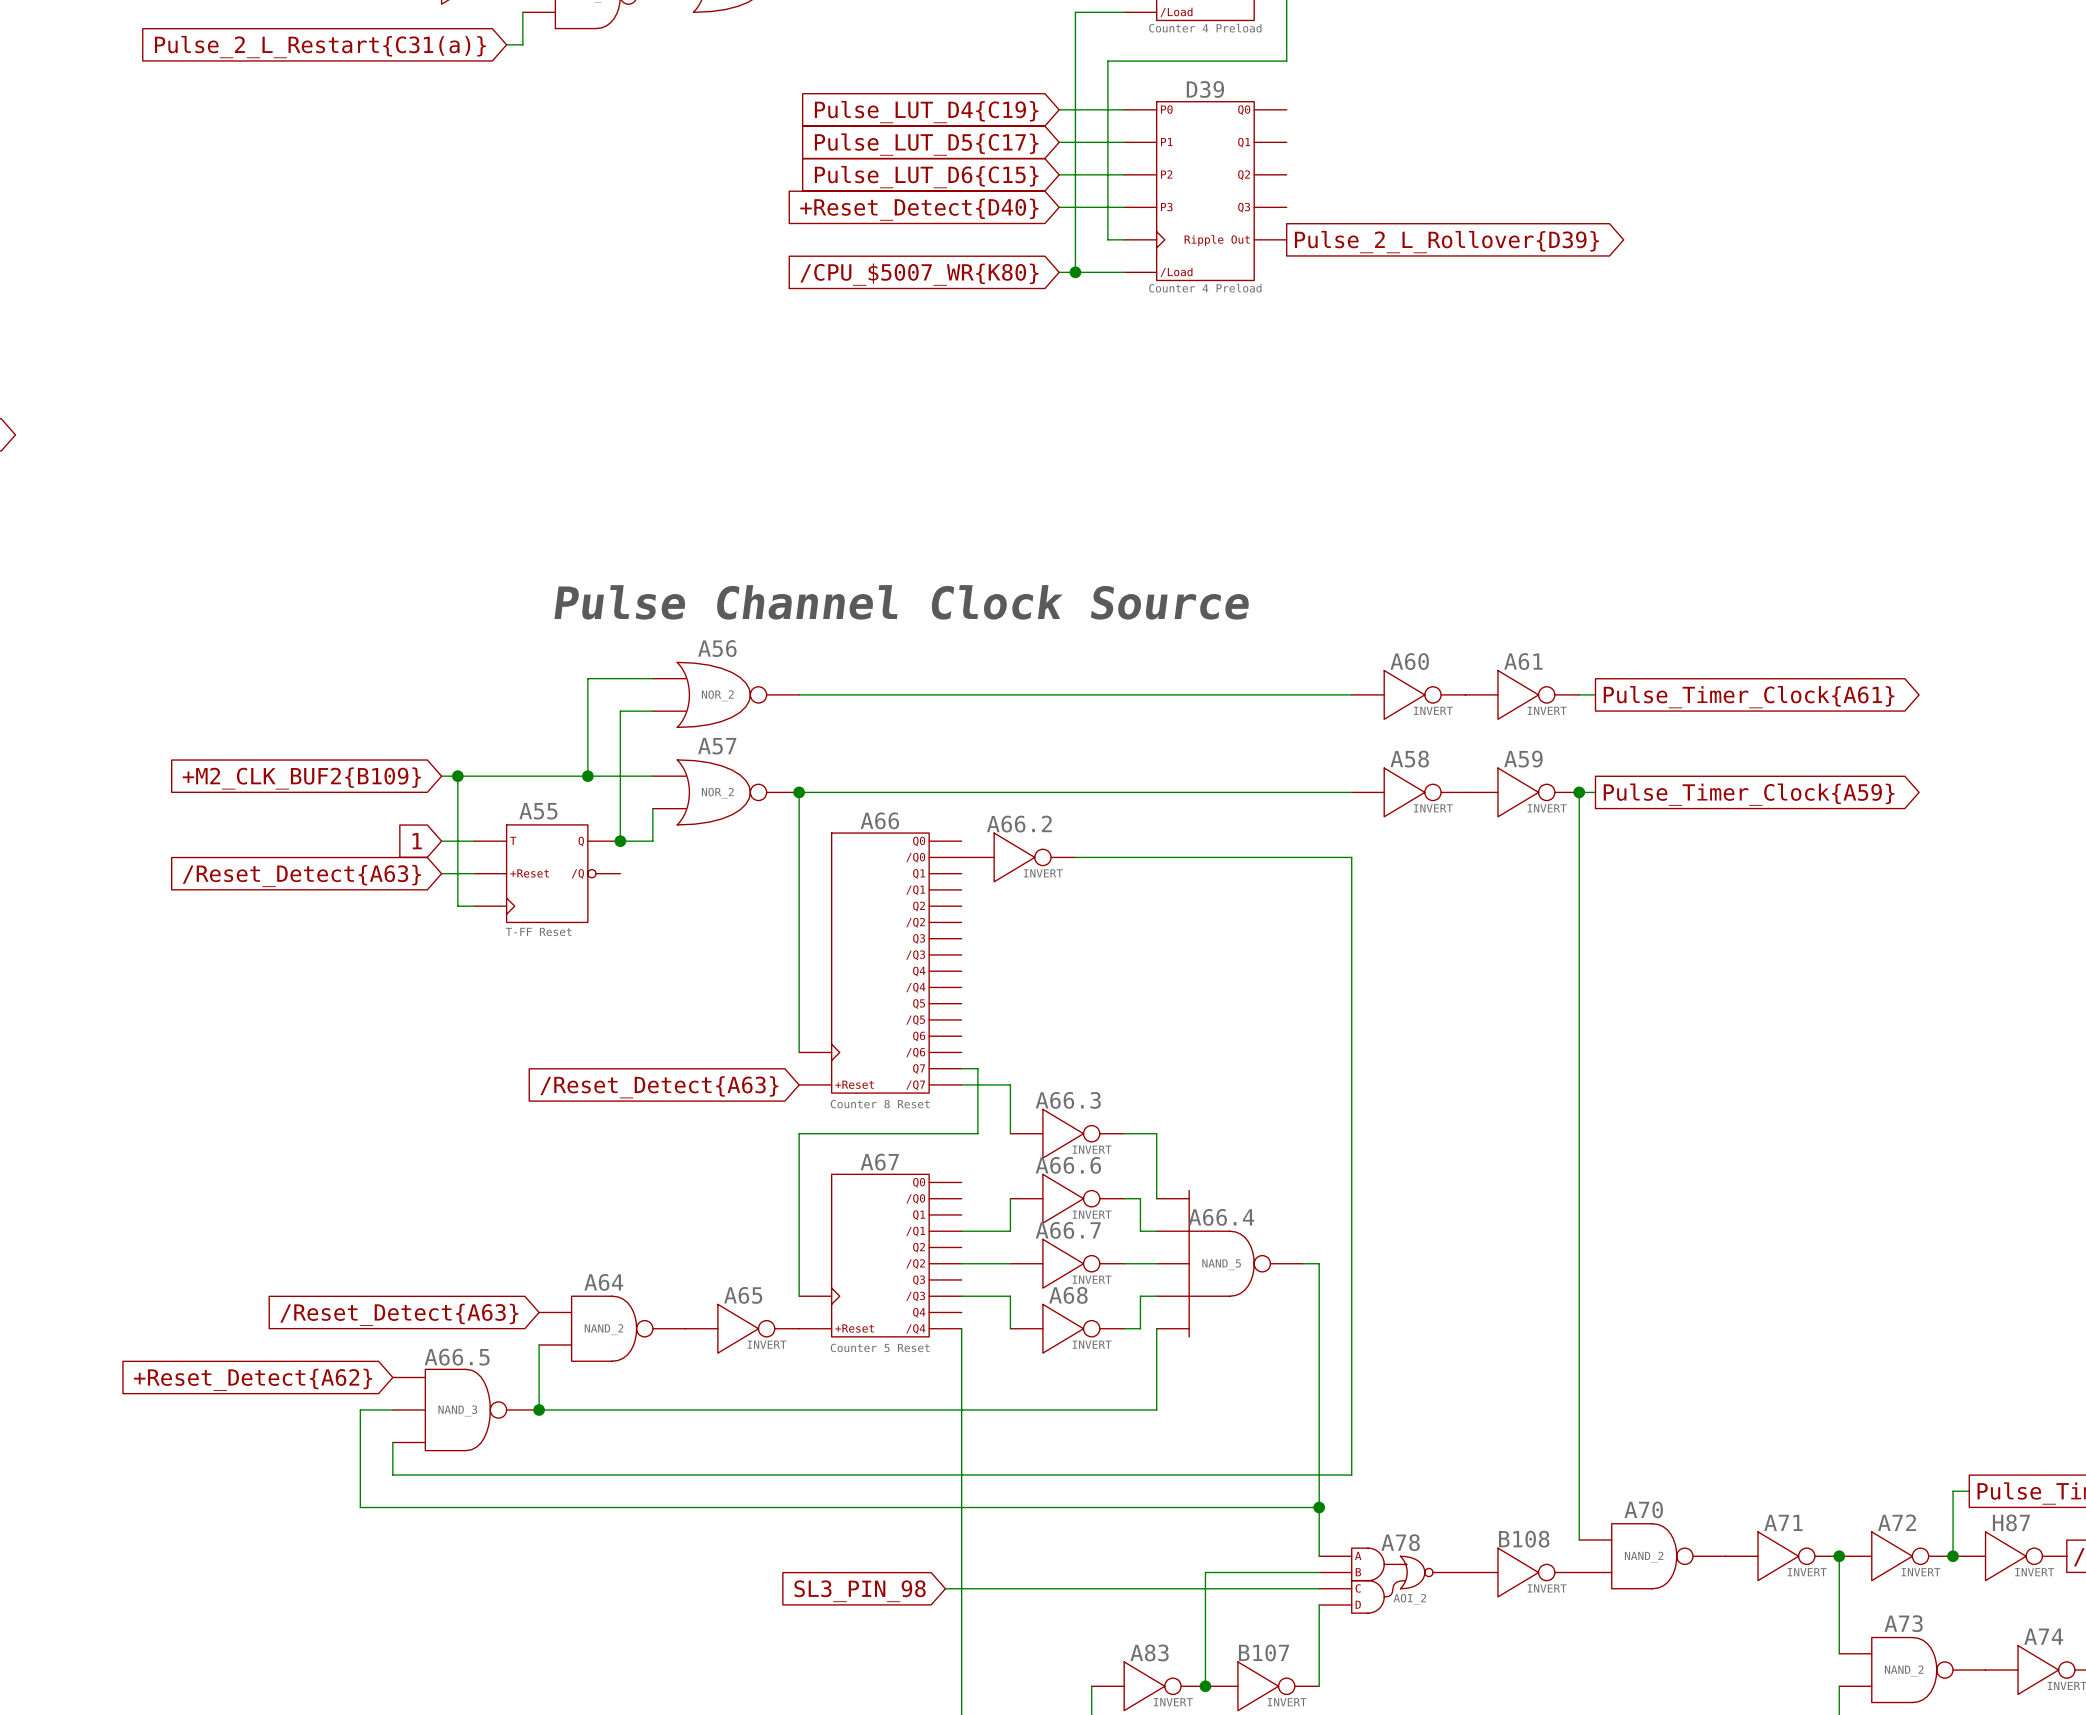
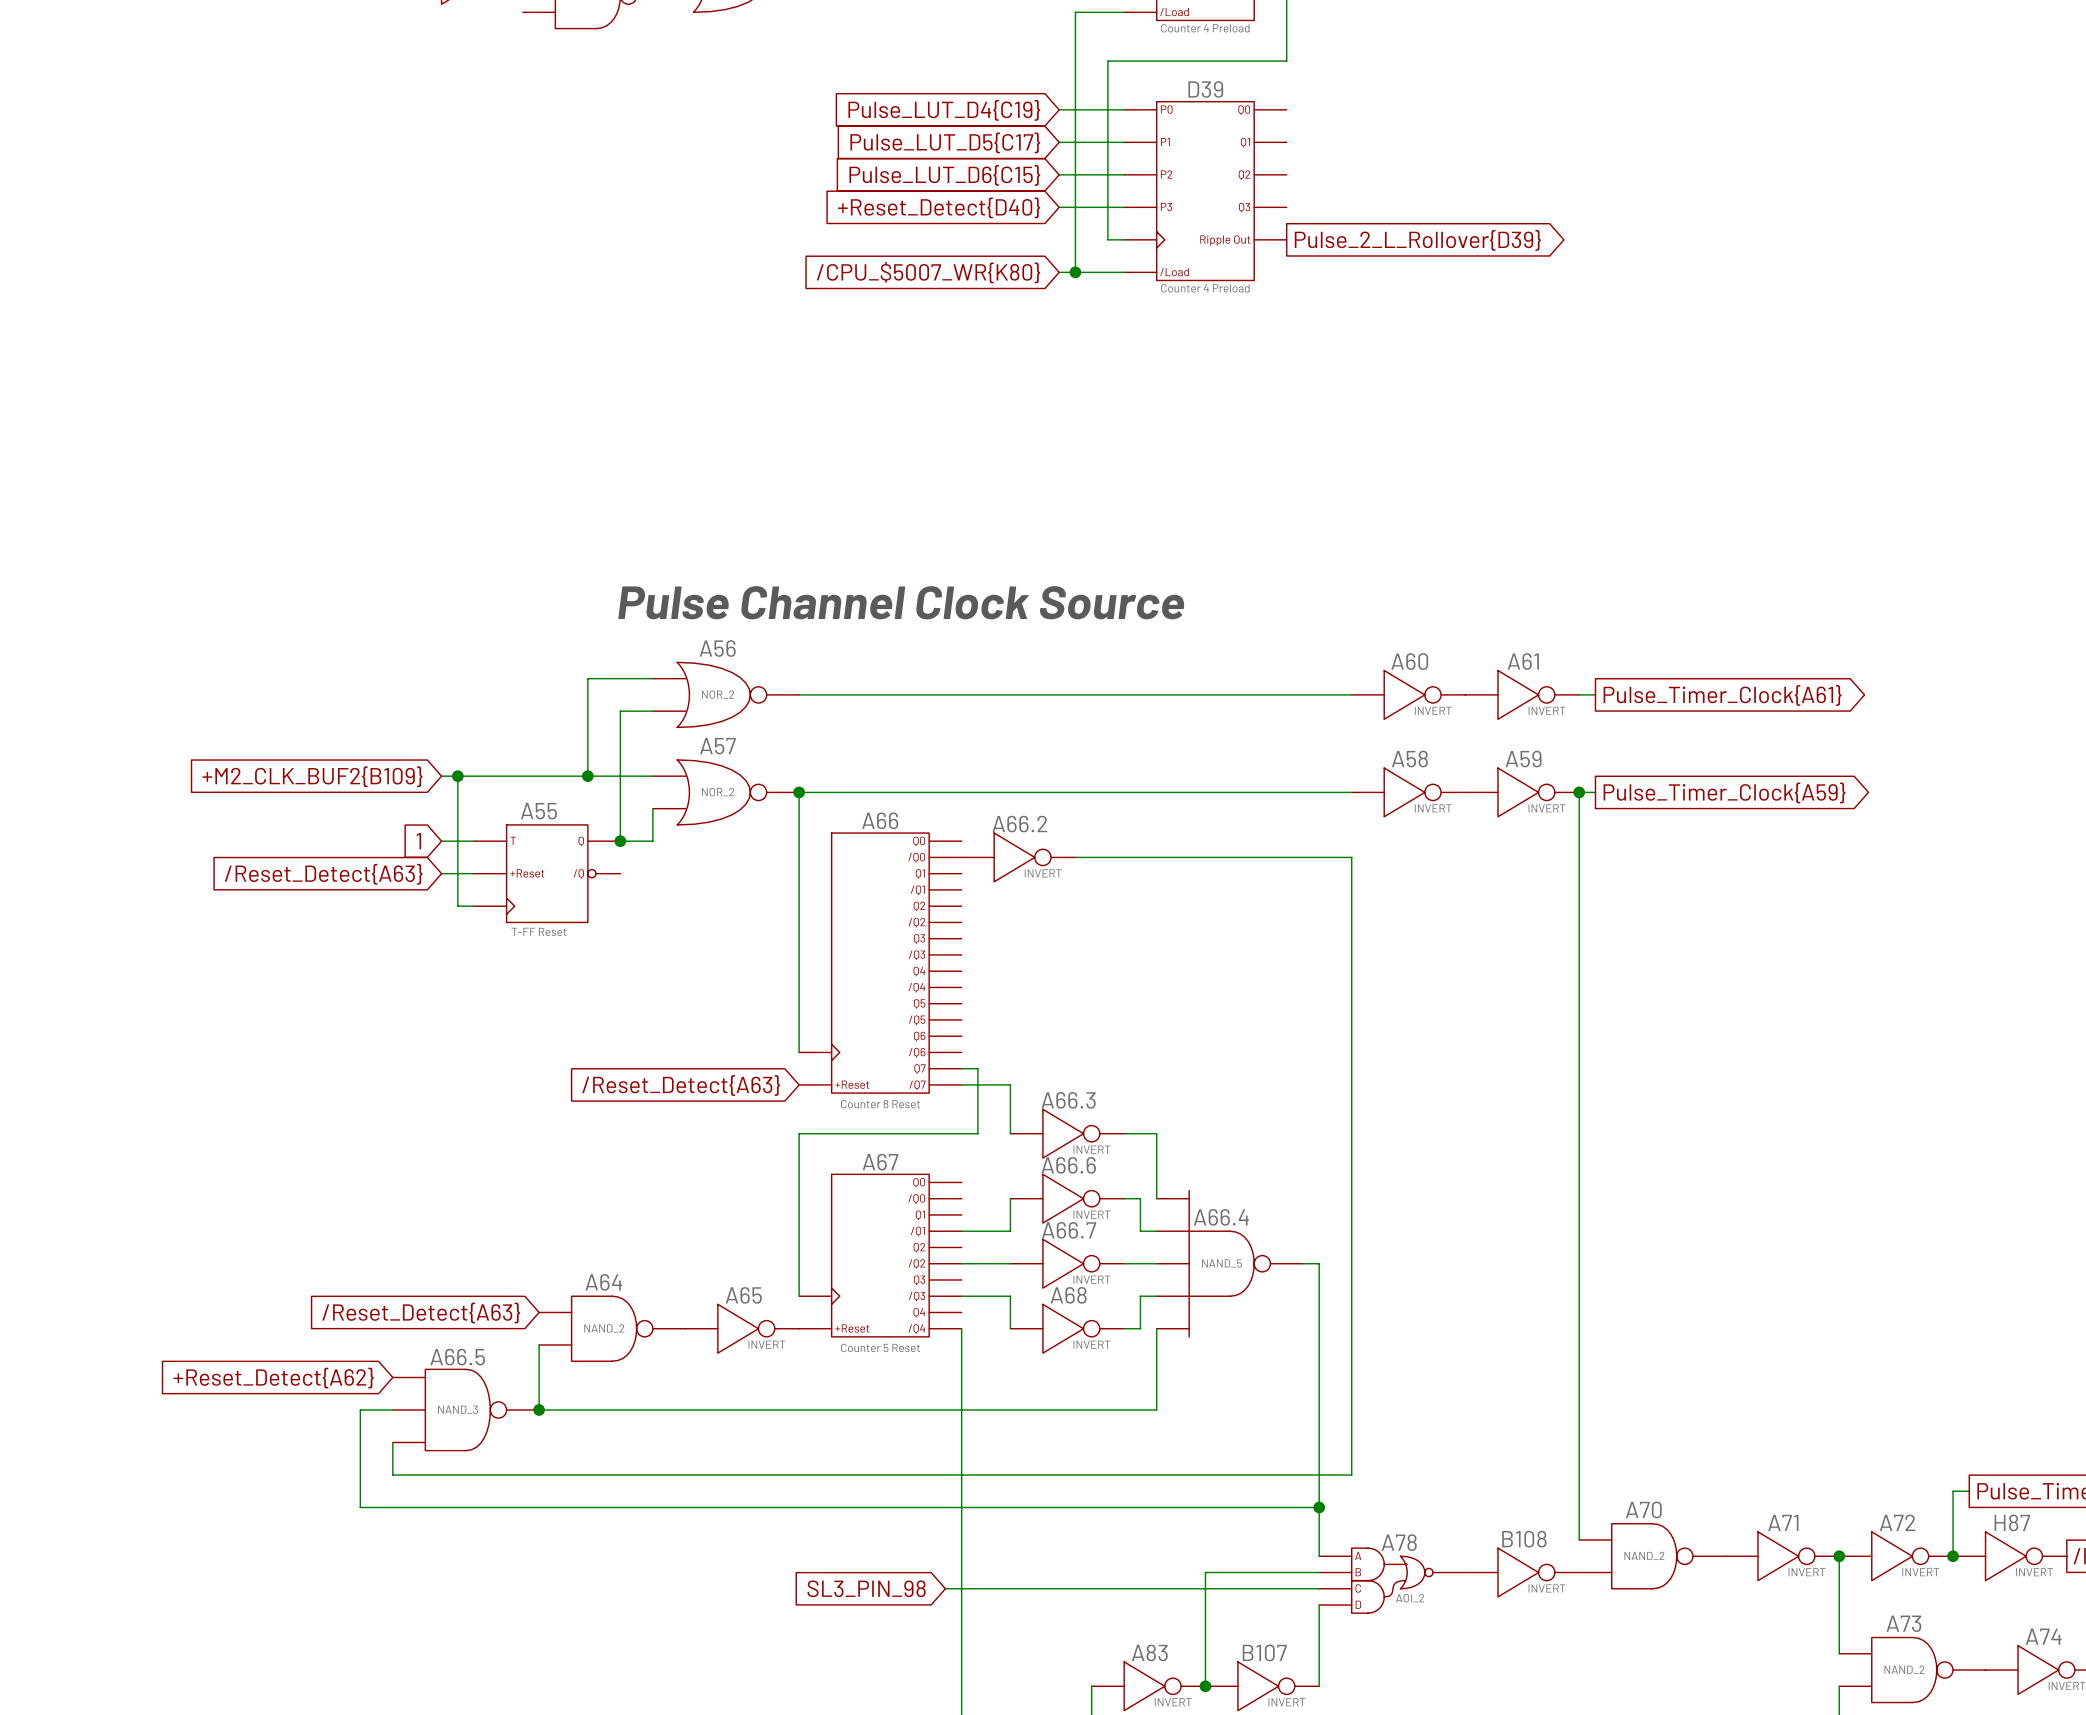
wire: (522, 12) (522, 44) (506, 44) -> none
global label: Pulse_2_L_Restart{C31(a)} (320, 47) -> none

